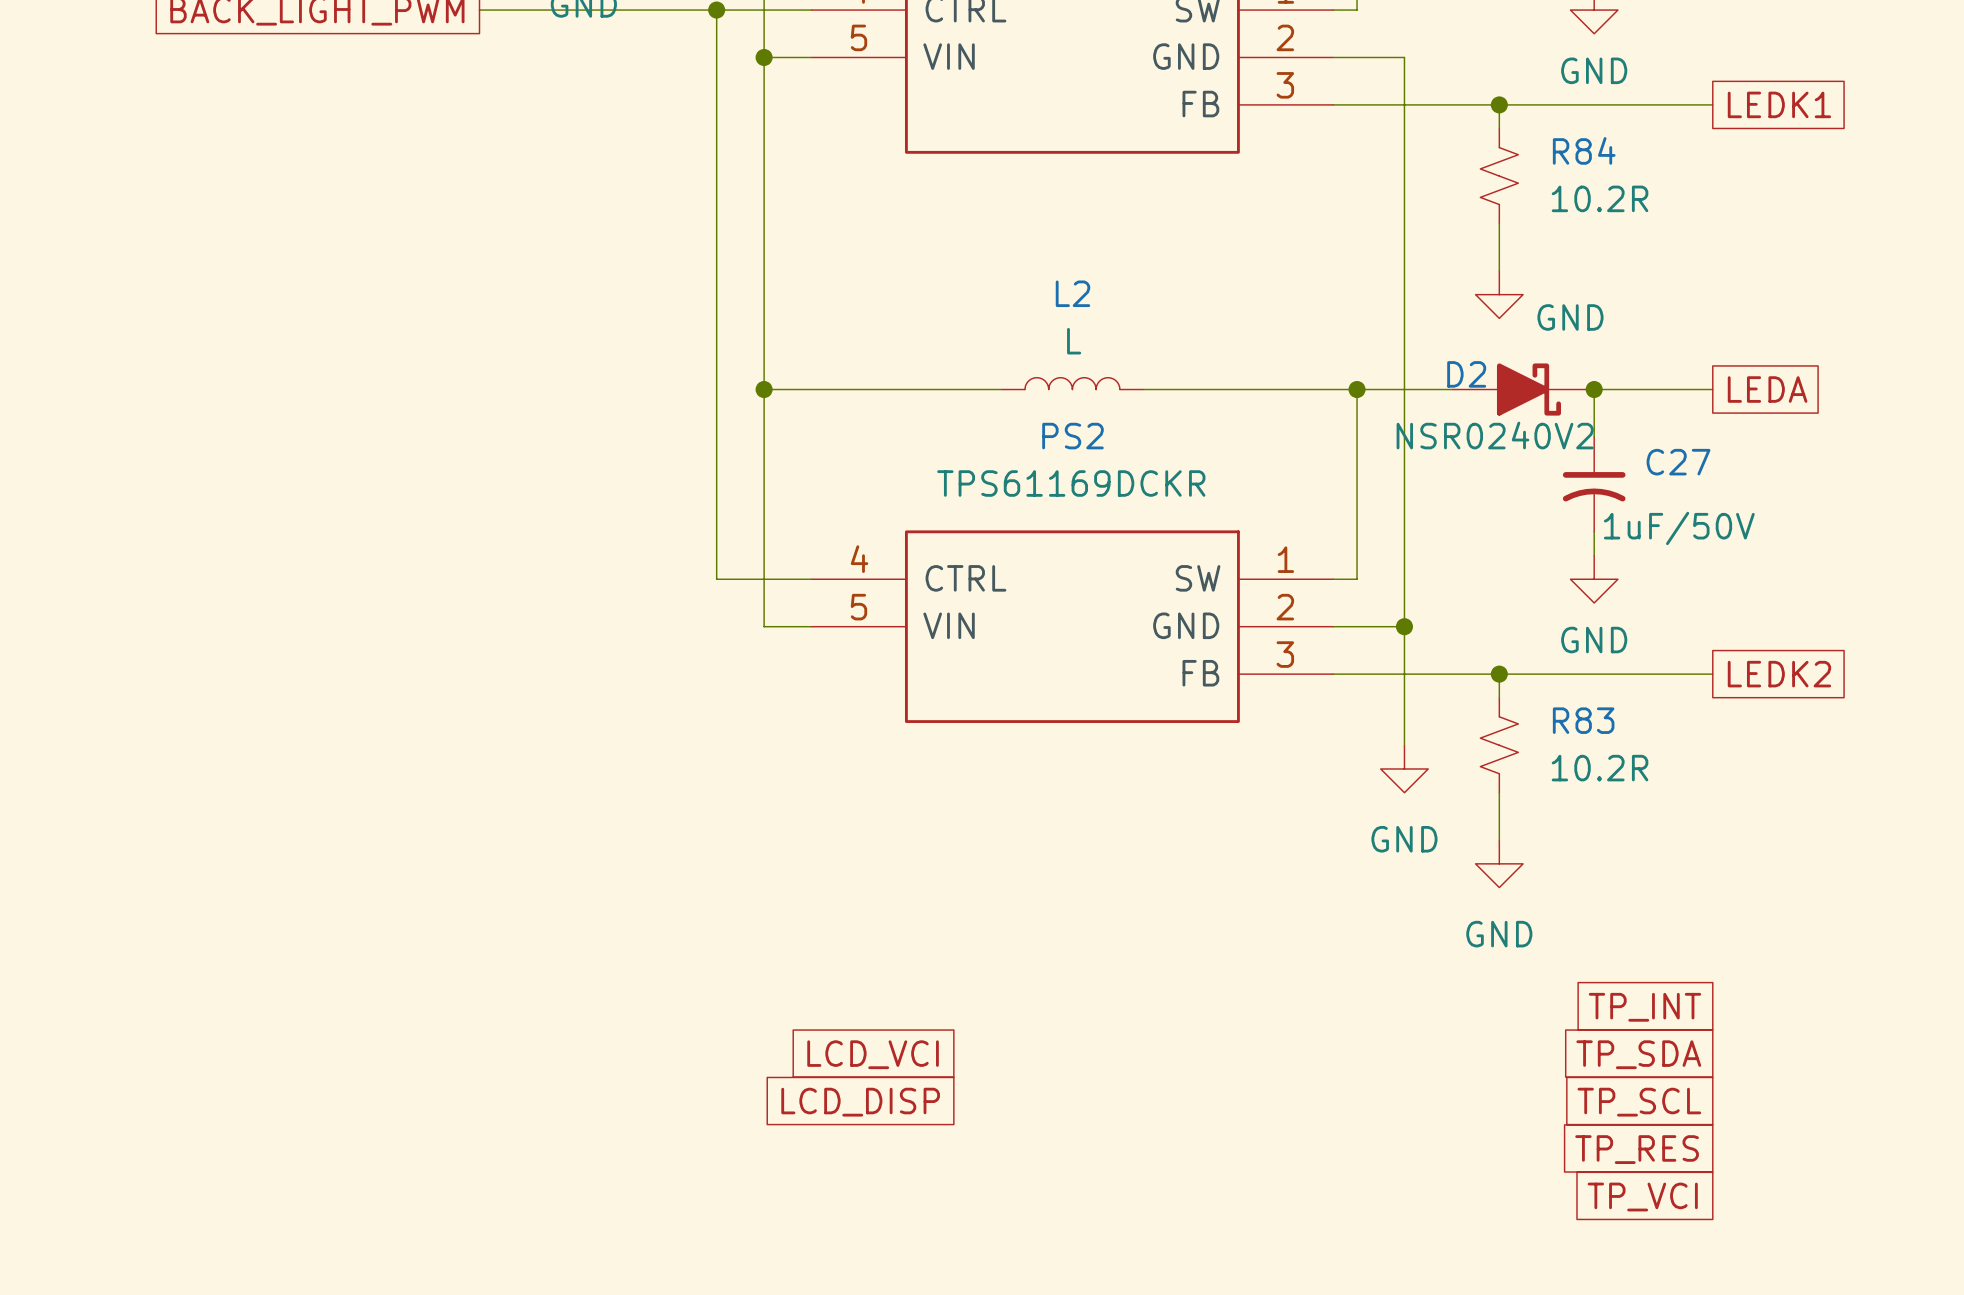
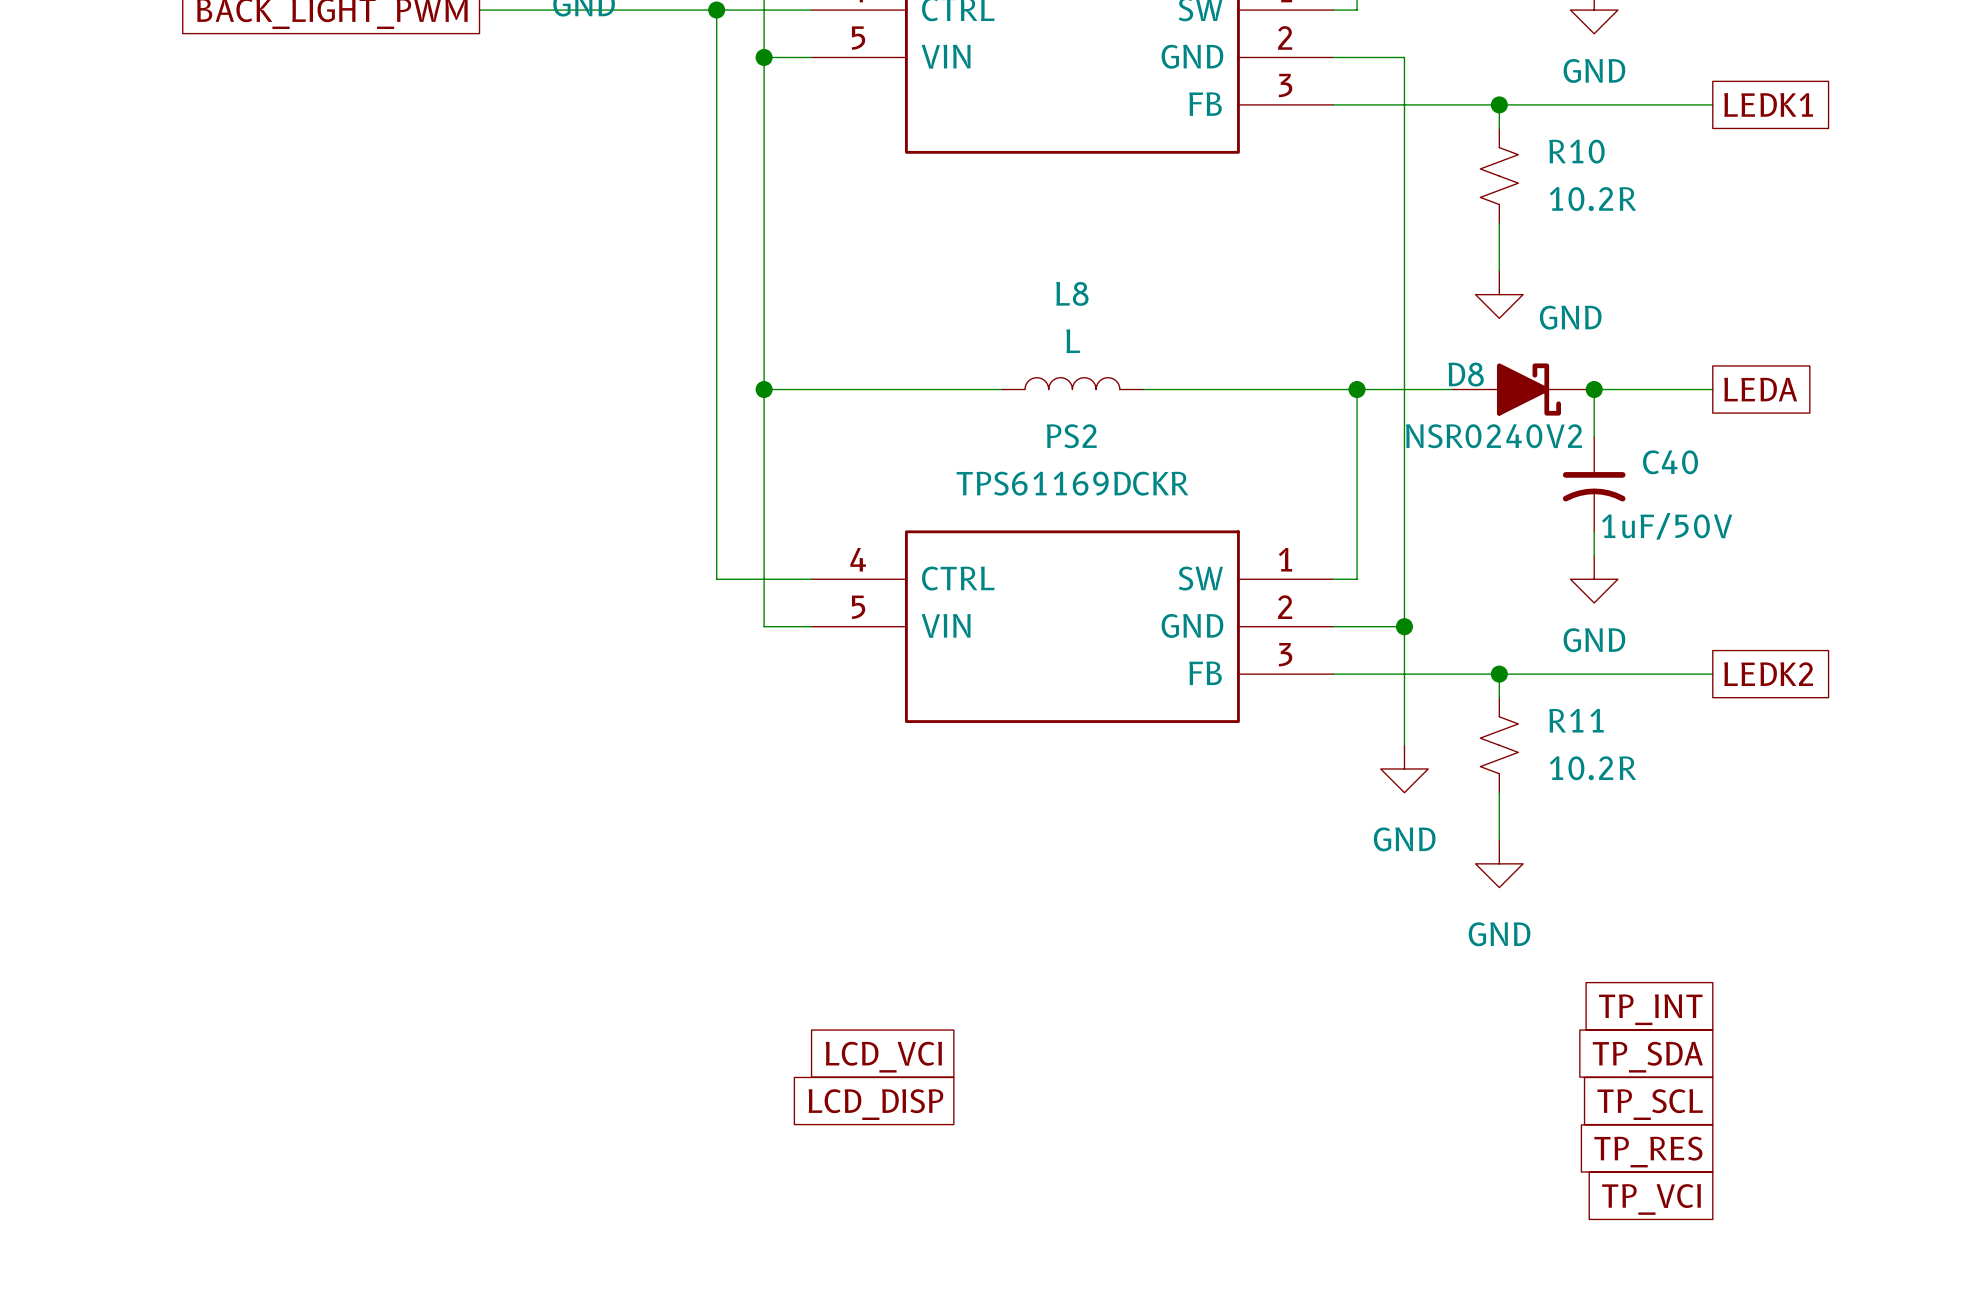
R84 name: R84 (1584, 150) -> R10 (1576, 151)
L2 name: L2 (1072, 293) -> L8 (1072, 293)
D2 name: D2 (1466, 374) -> D8 (1466, 374)
C27 name: C27 (1678, 462) -> C40 (1670, 462)
R83 name: R83 (1583, 720) -> R11 (1576, 720)

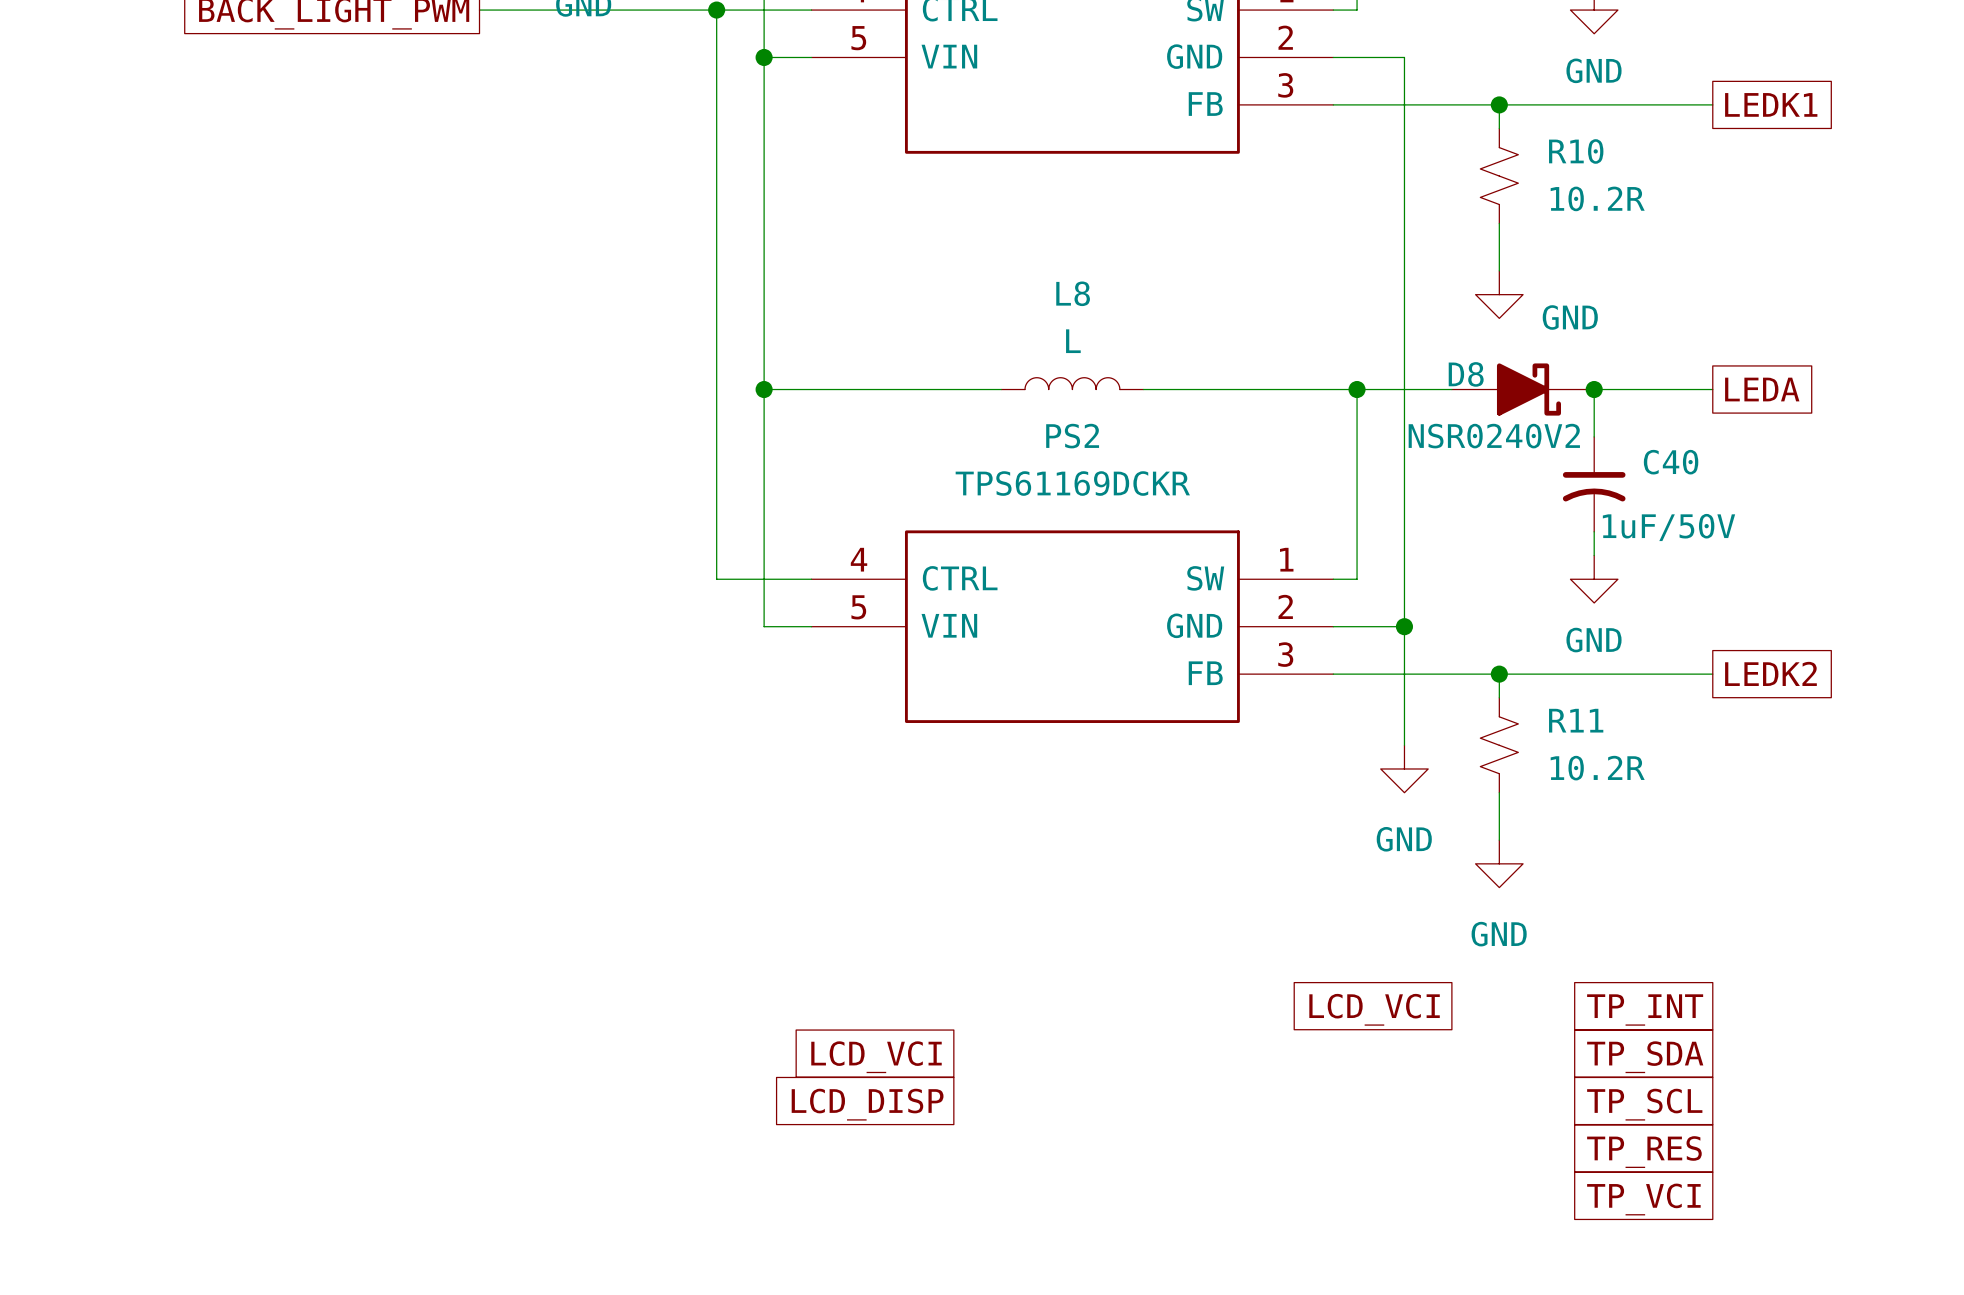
global label: none -> LCD_VCI (1374, 1009)

